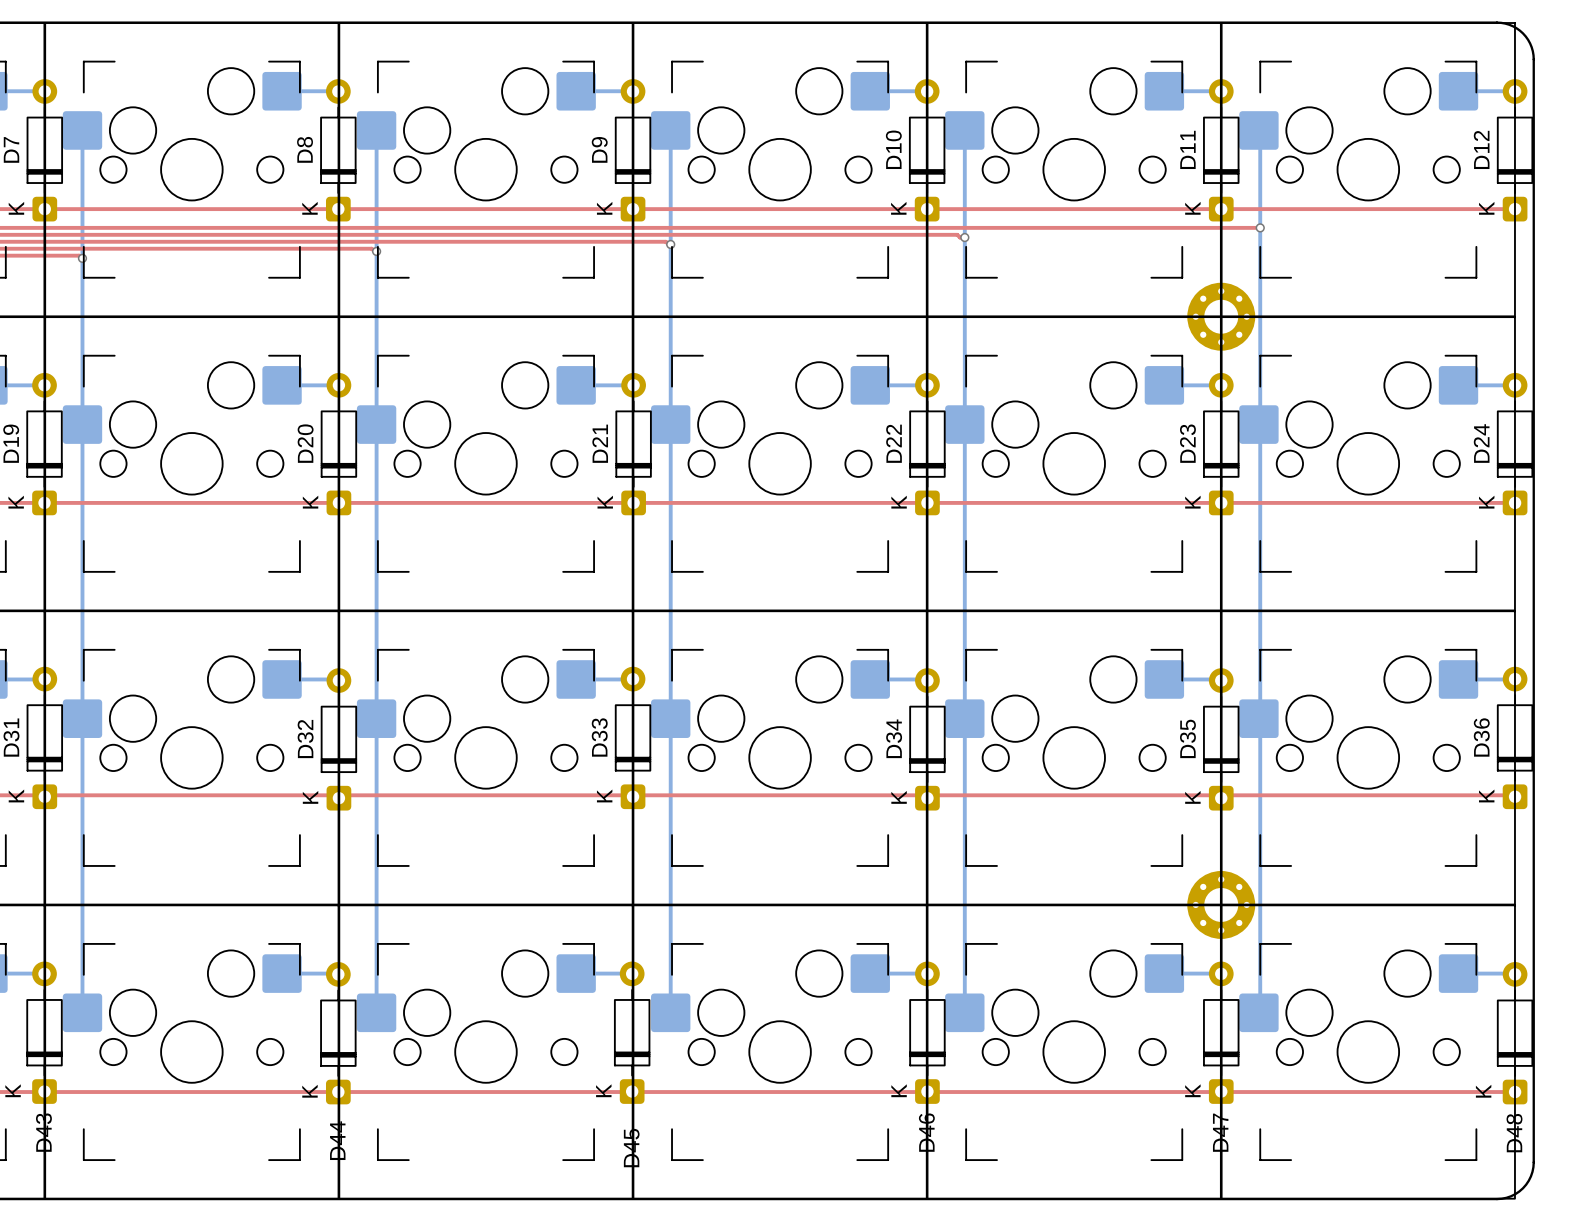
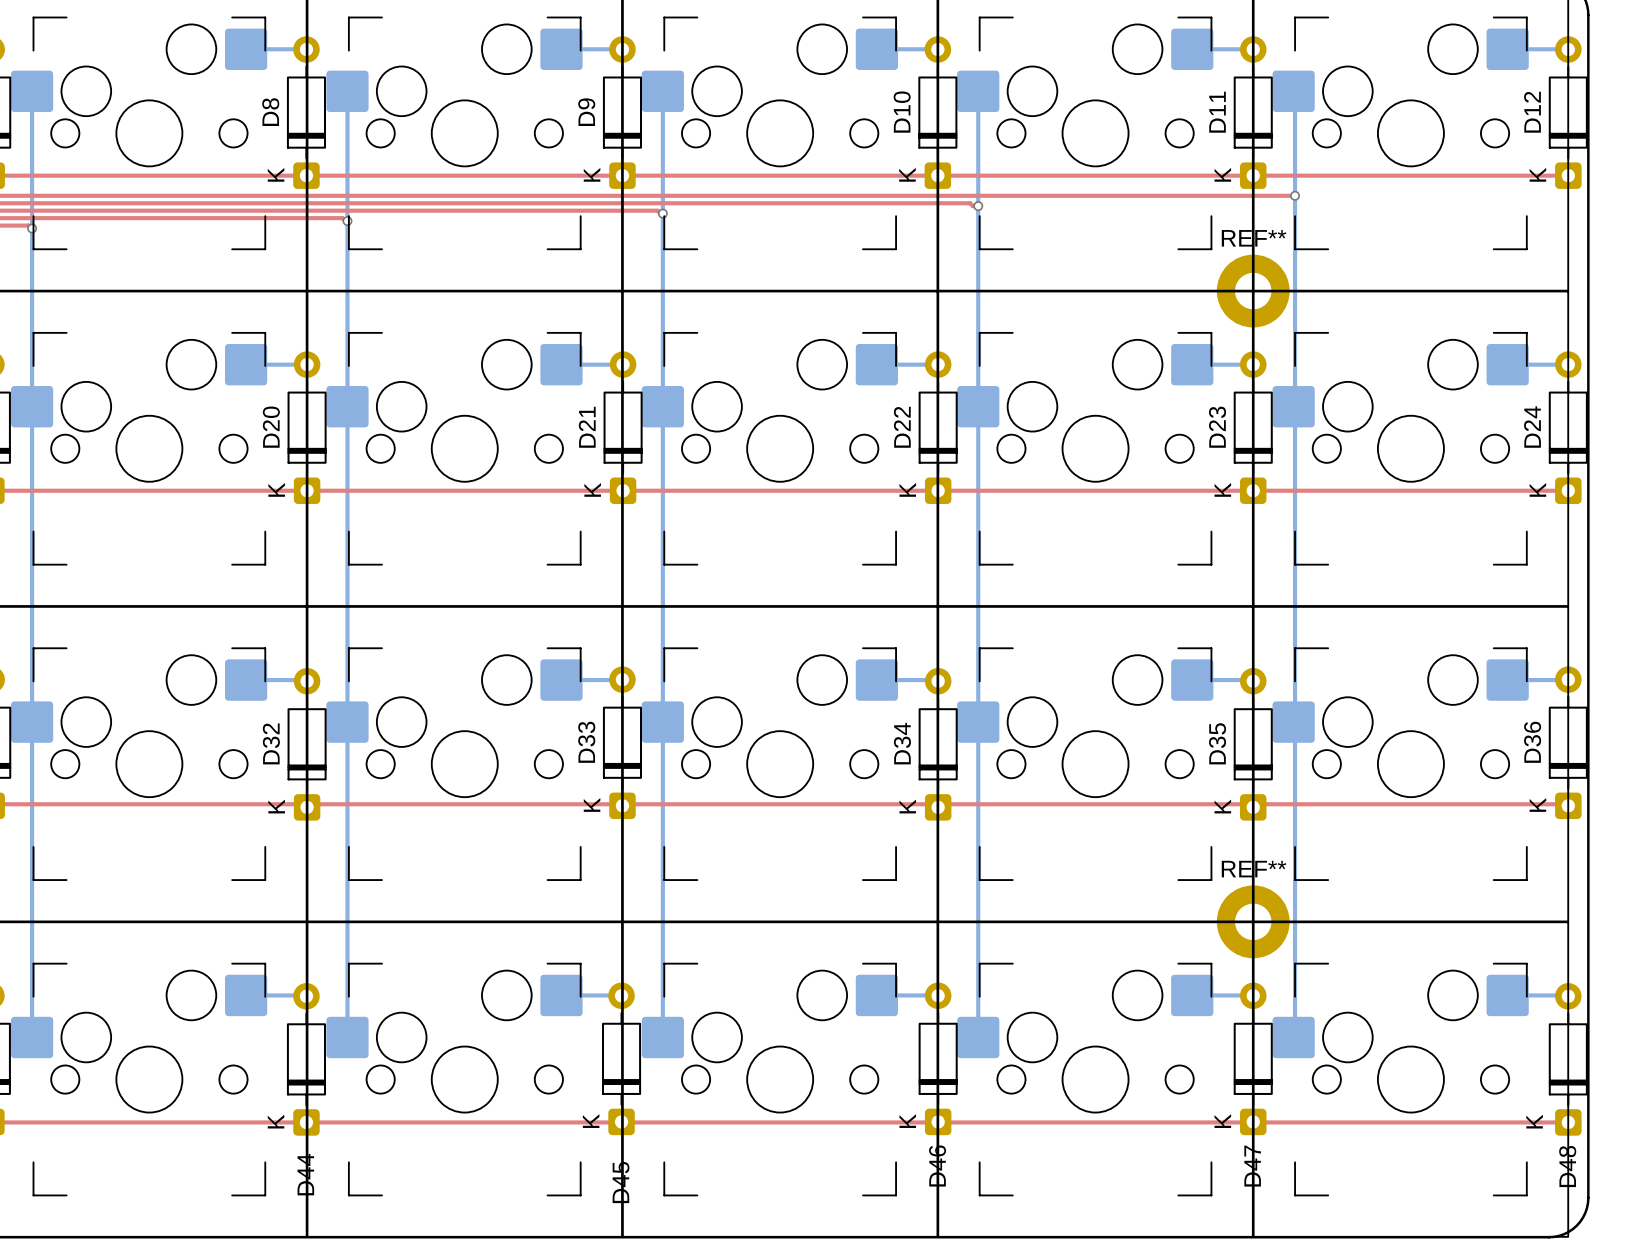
part: (1221, 316) -> none
REF**: none -> (1253, 291)
part: (1221, 904) -> none
REF**: none -> (1253, 921)

